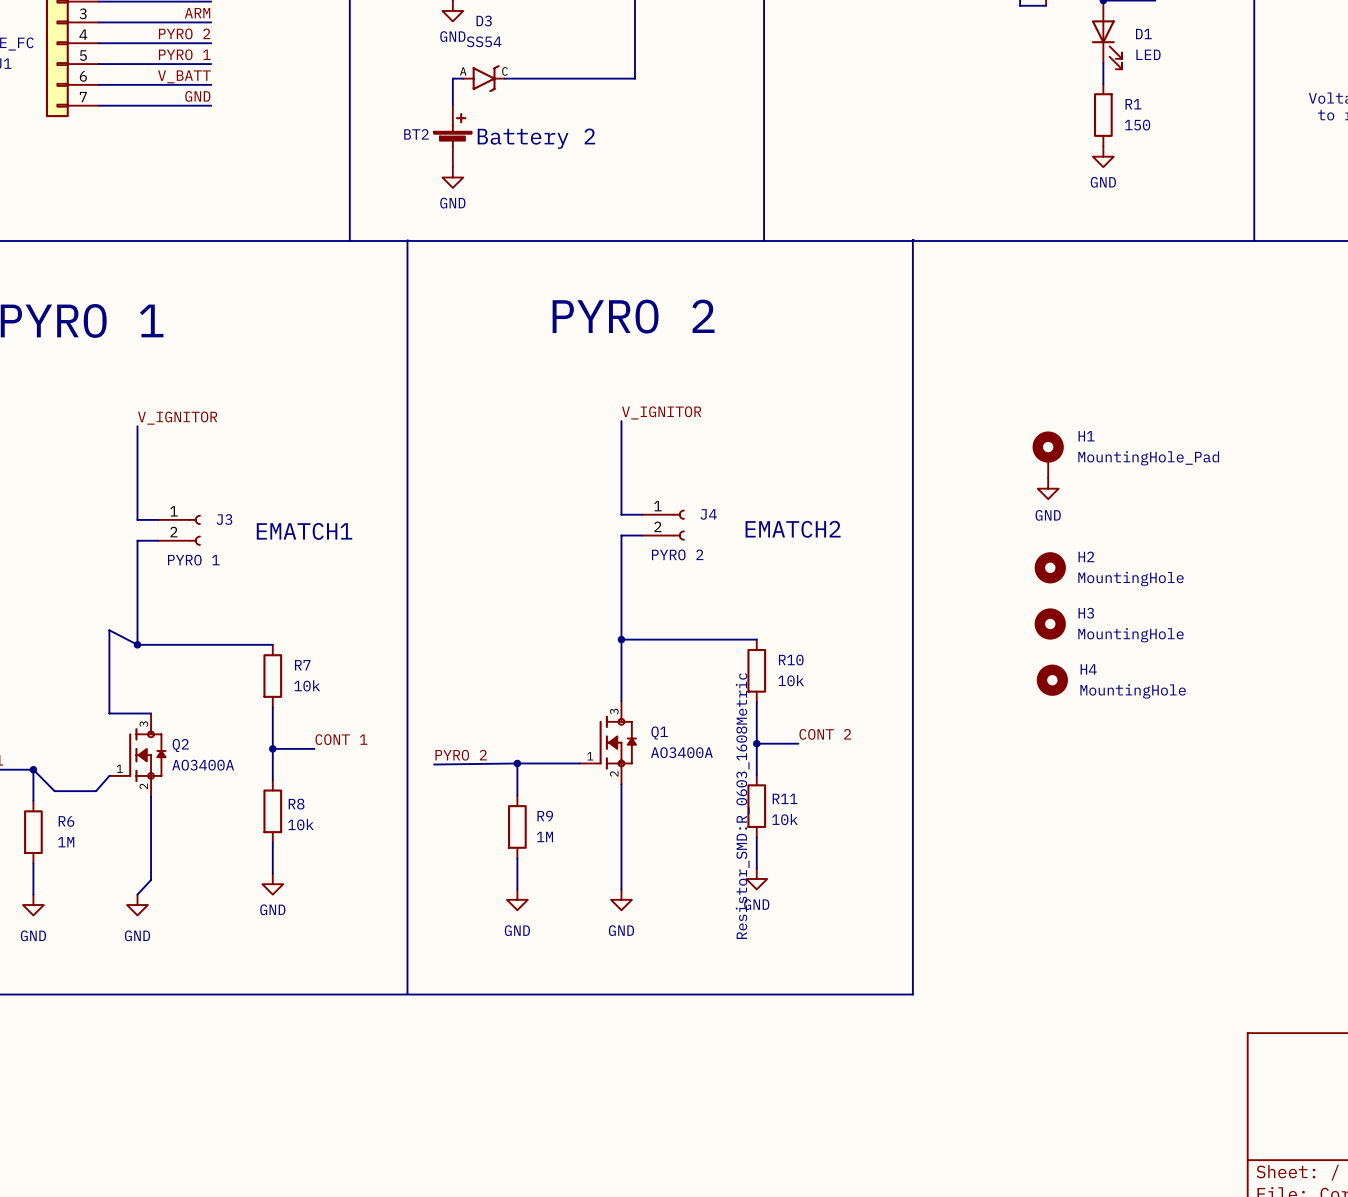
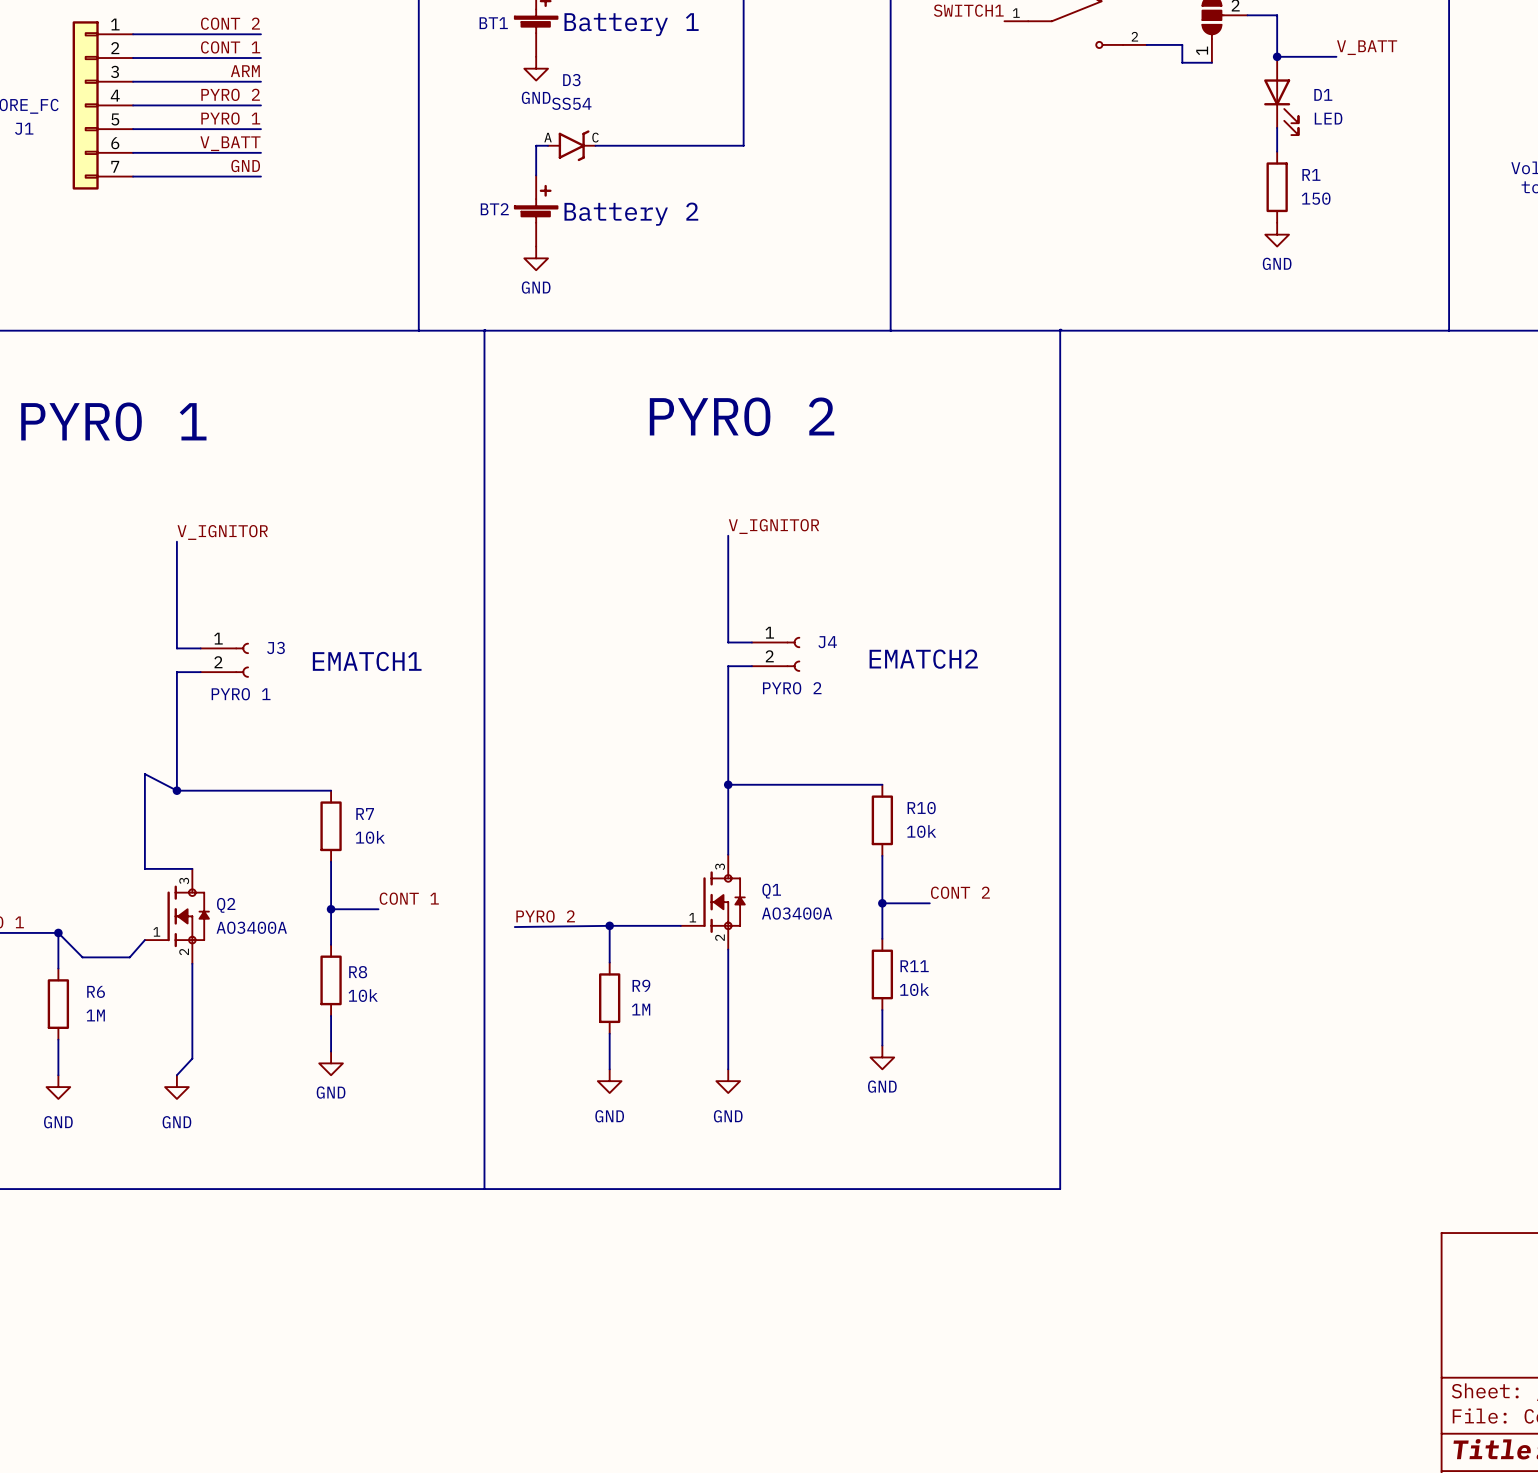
H1: MountingHole_Pad (1048, 454) -> none
power symbol: GND (1048, 488) -> none
H2: MountingHole (1050, 567) -> none
H3: MountingHole (1050, 624) -> none
H4: MountingHole (1052, 680) -> none
R11 text: Resistor_SMD:R_0603_1608Metric (742, 806) -> none

